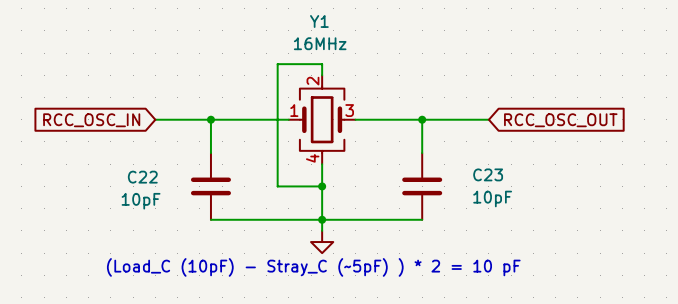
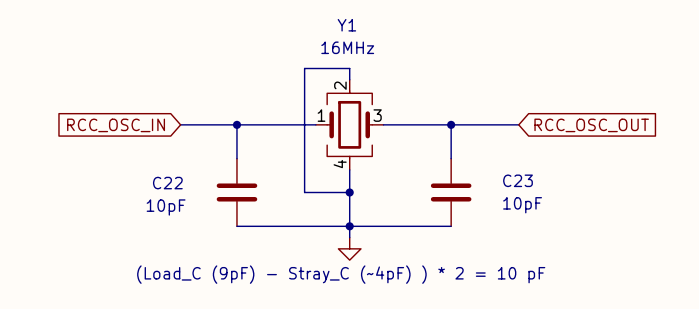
text: (Load_C (10pF) - Stray_C (~5pF) ) * 2 = 10 pF (313, 267) -> (Load_C (9pF) - Stray_C (~4pF) ) * 2 = 10 pF (341, 274)

